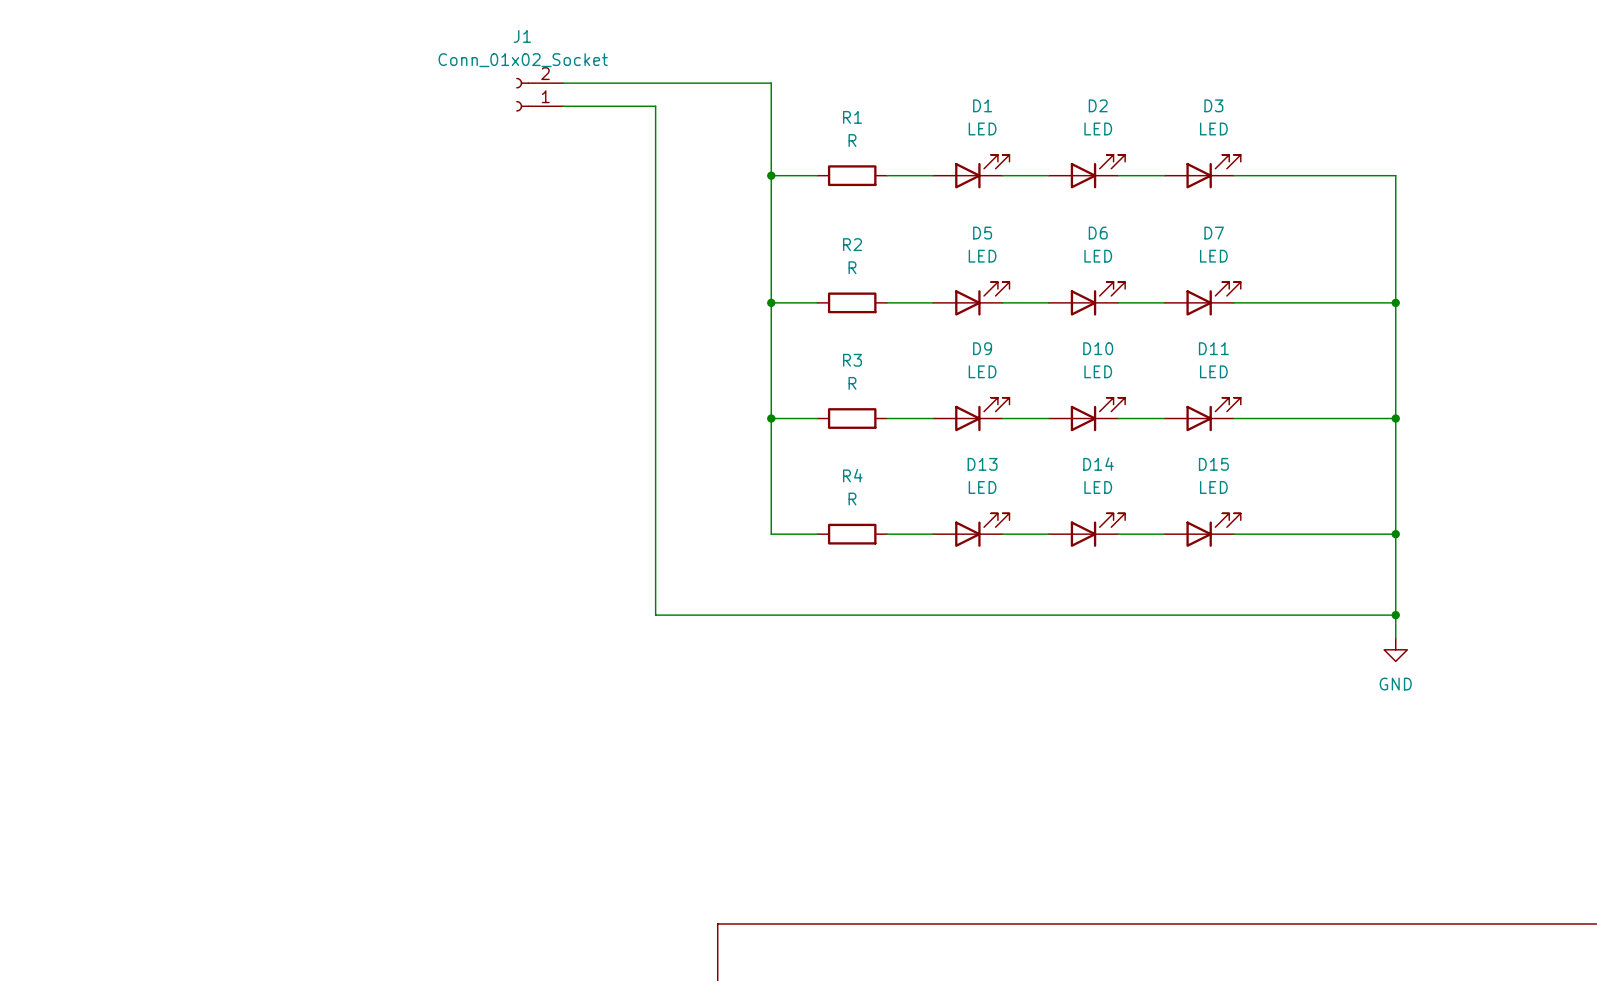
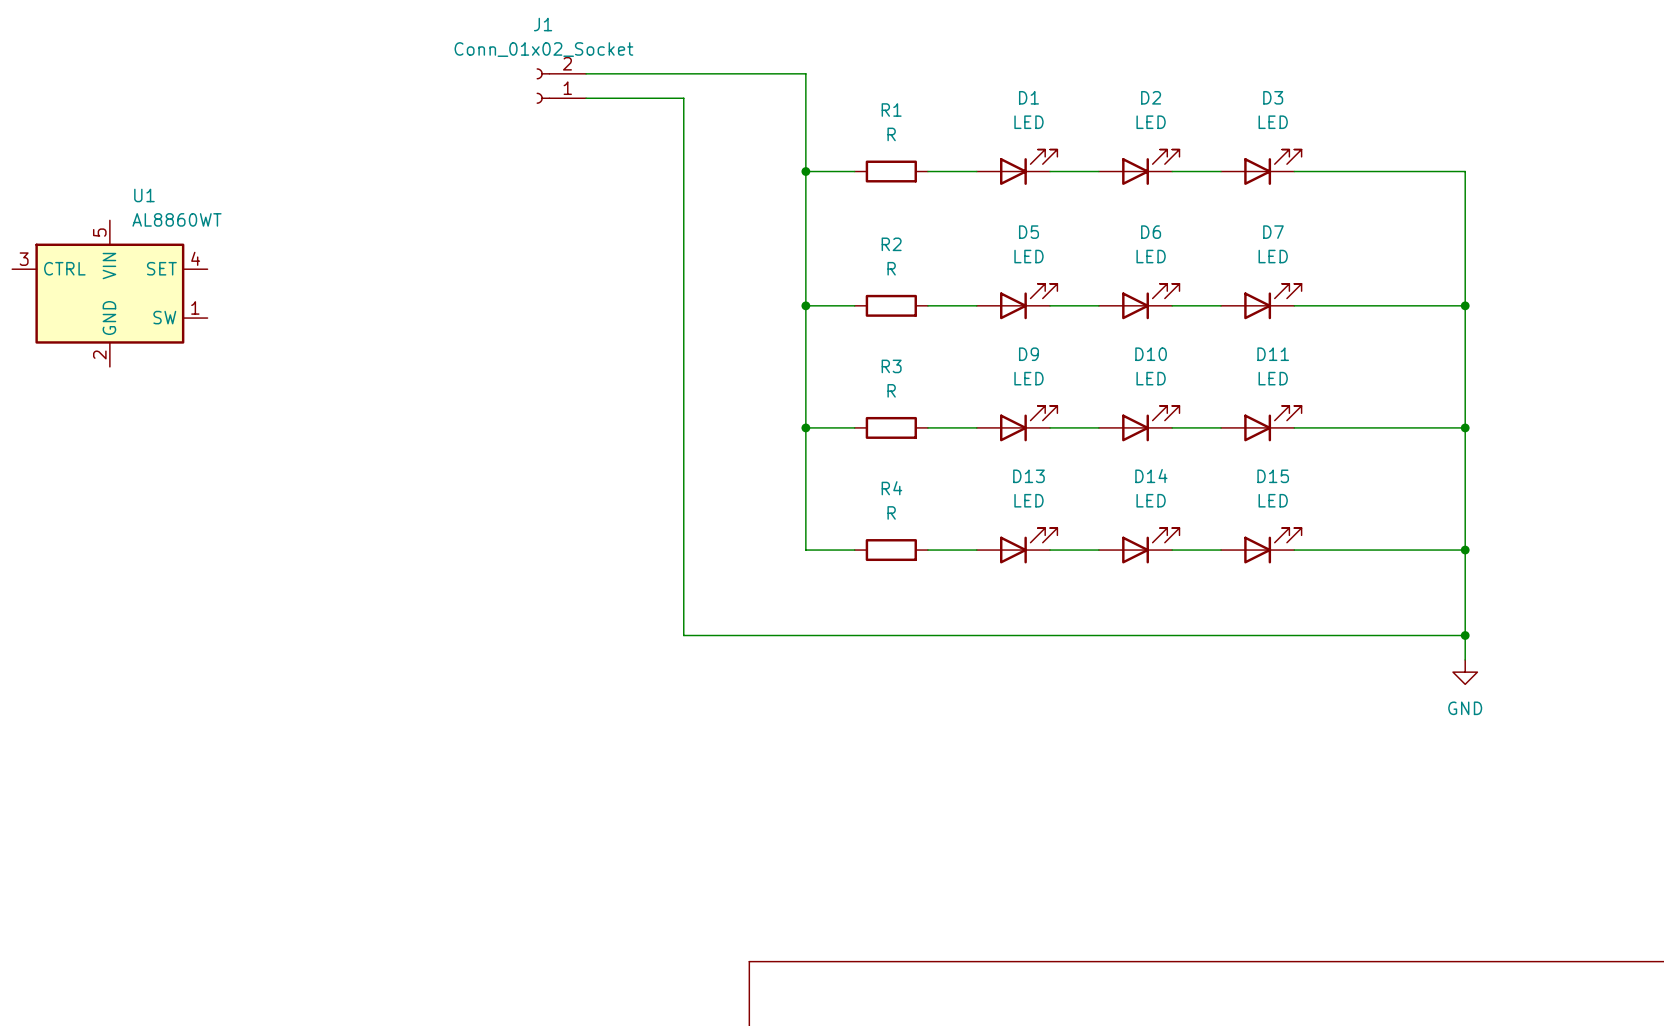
U1: none -> AL8860WT (109, 293)

